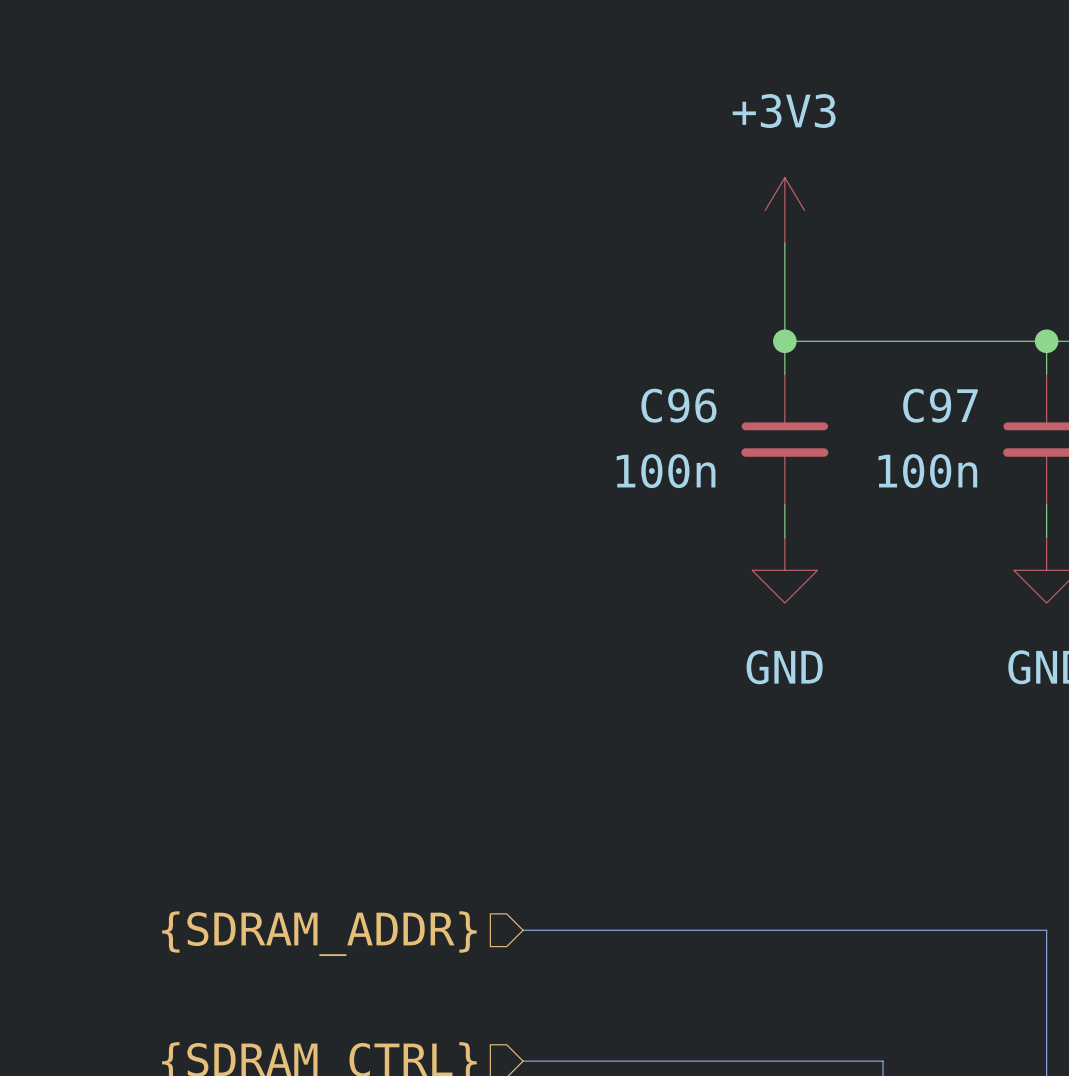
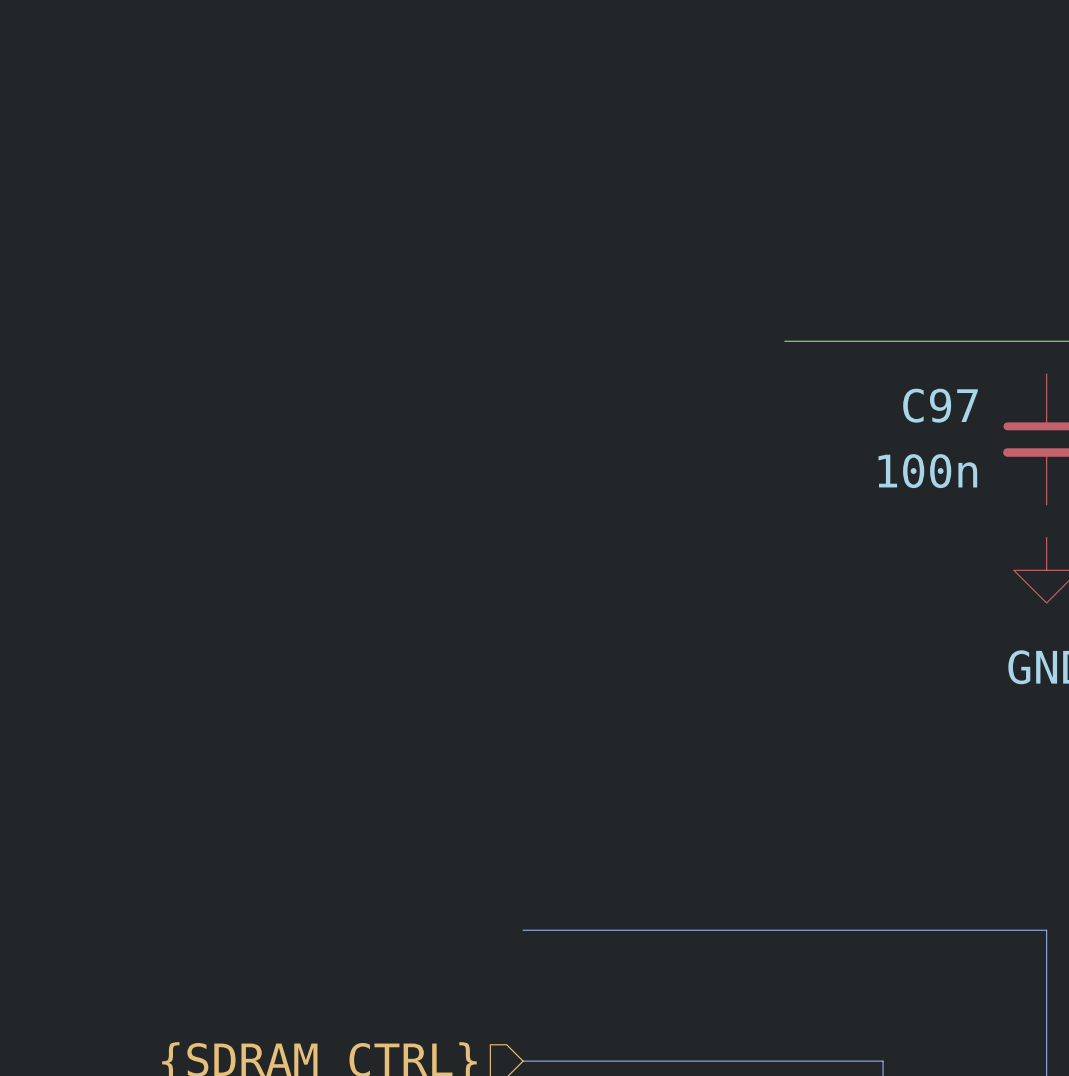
power symbol: +3V3 (784, 210) -> none
wire: (784, 243) (784, 373) -> none
junction: (784, 341) -> none
wire: (1046, 341) (1046, 373) -> none
junction: (1046, 341) -> none
C96: 100n (784, 439) -> none
wire: (784, 504) (784, 537) -> none
wire: (1046, 504) (1046, 537) -> none
power symbol: GND (784, 570) -> none
hierarchical label: {SDRAM_ADDR} (319, 933) -> none

